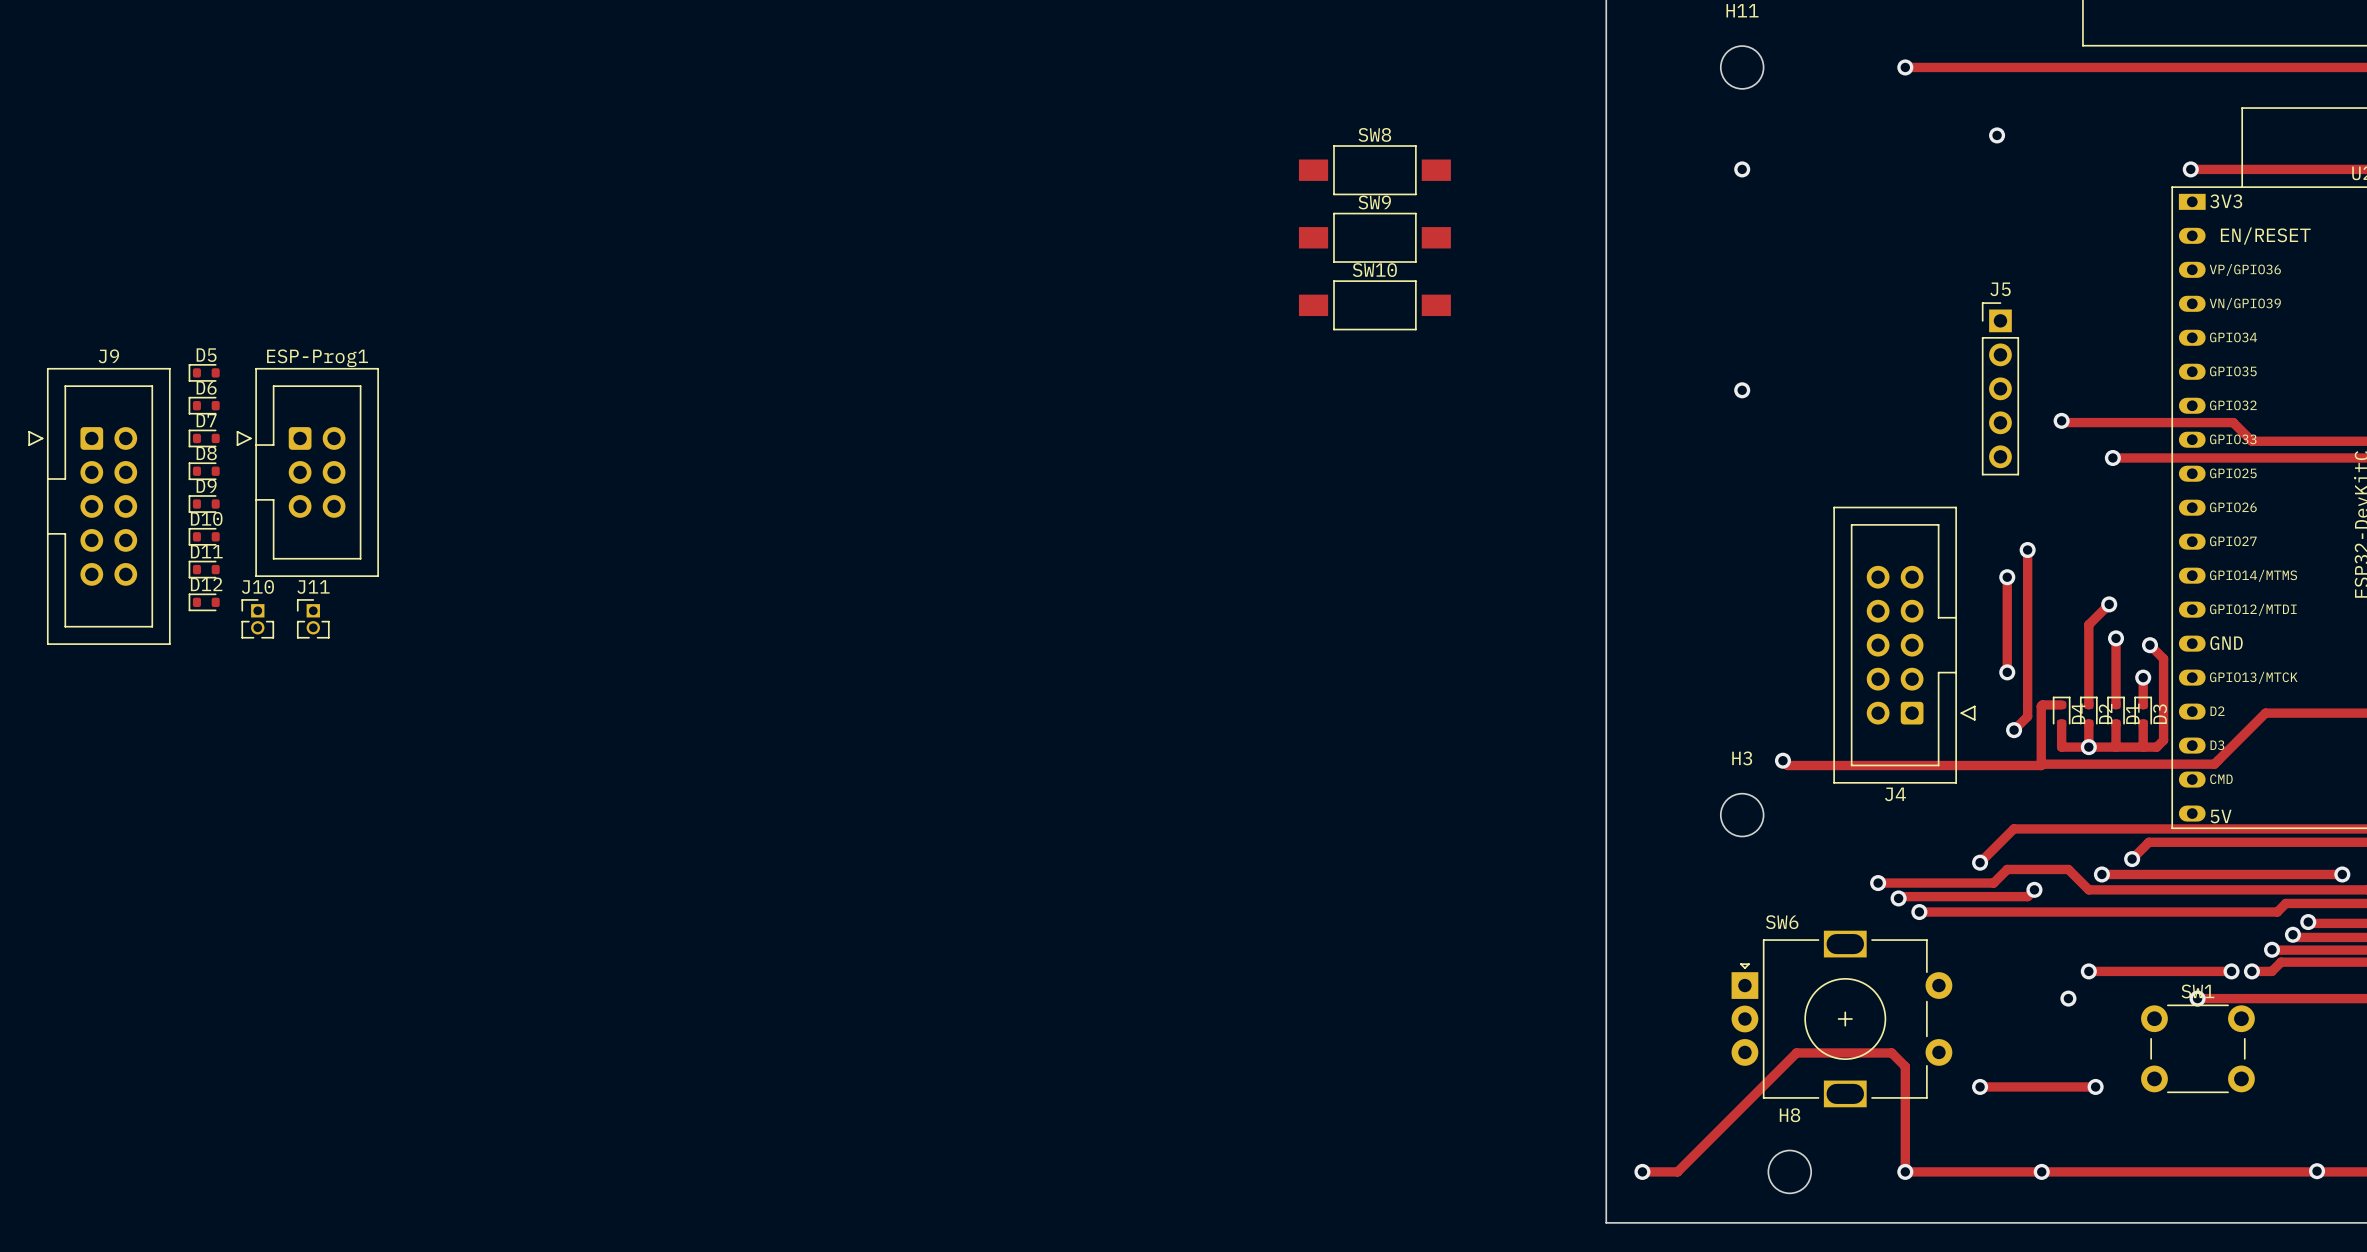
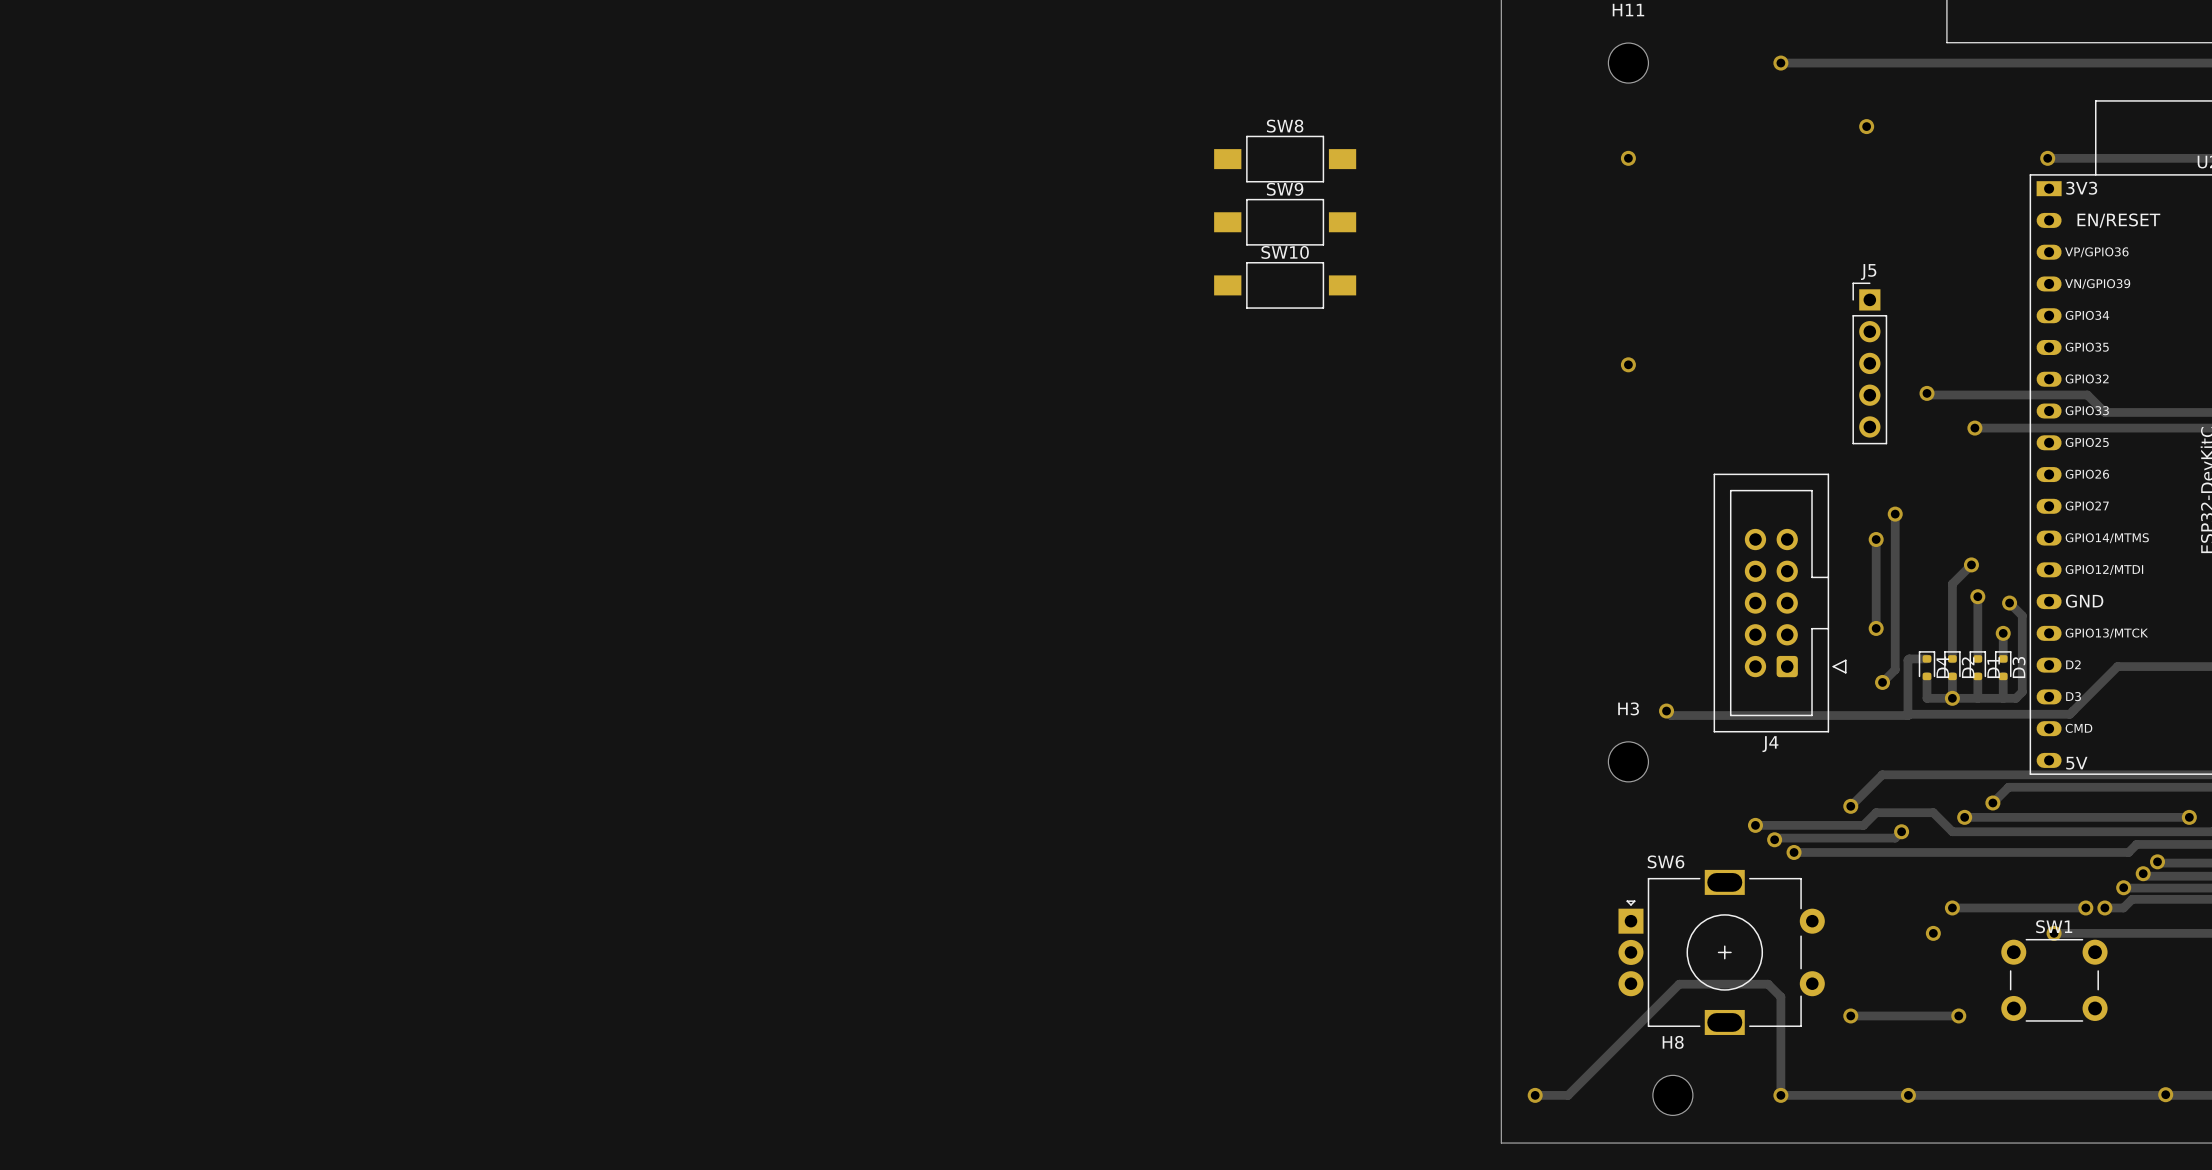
D5: (204, 372) -> none
D6: (204, 405) -> none
D7: (204, 438) -> none
D8: (204, 471) -> none
ESP-Prog1: (307, 472) -> none
D9: (204, 504) -> none
J9: (99, 506) -> none
D10: (204, 536) -> none
D11: (204, 569) -> none
D12: (204, 602) -> none
J10: (257, 618) -> none
J11: (313, 618) -> none

